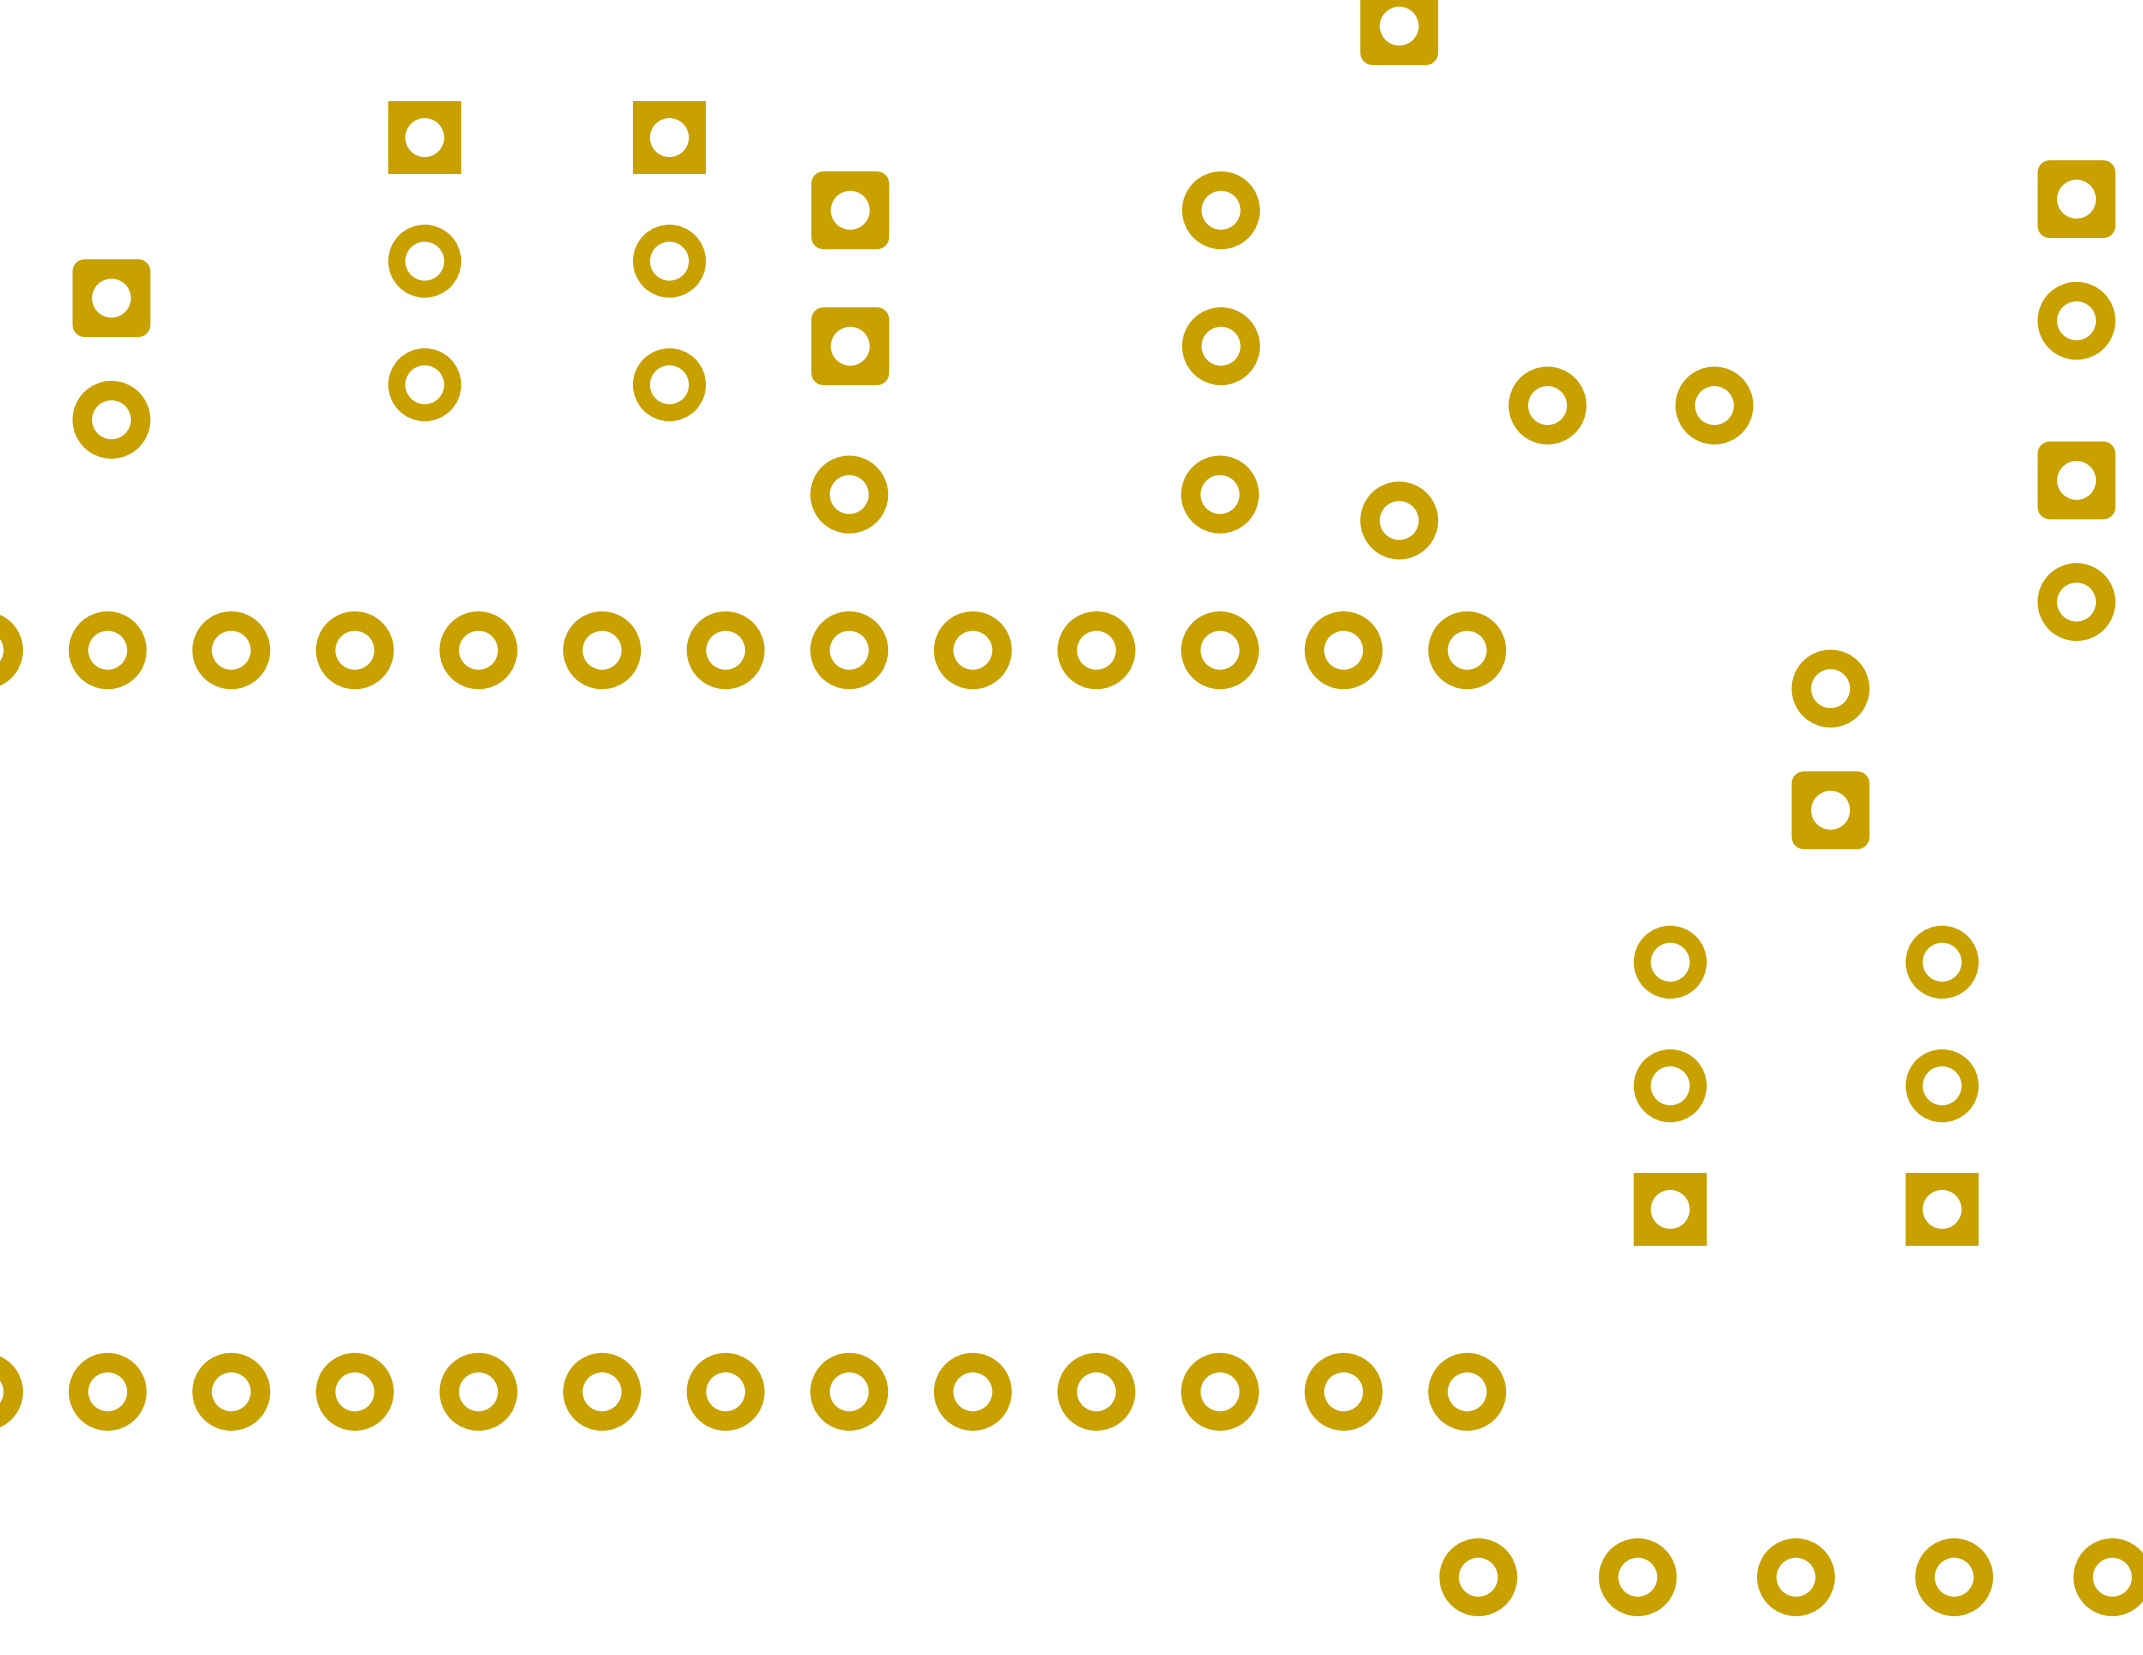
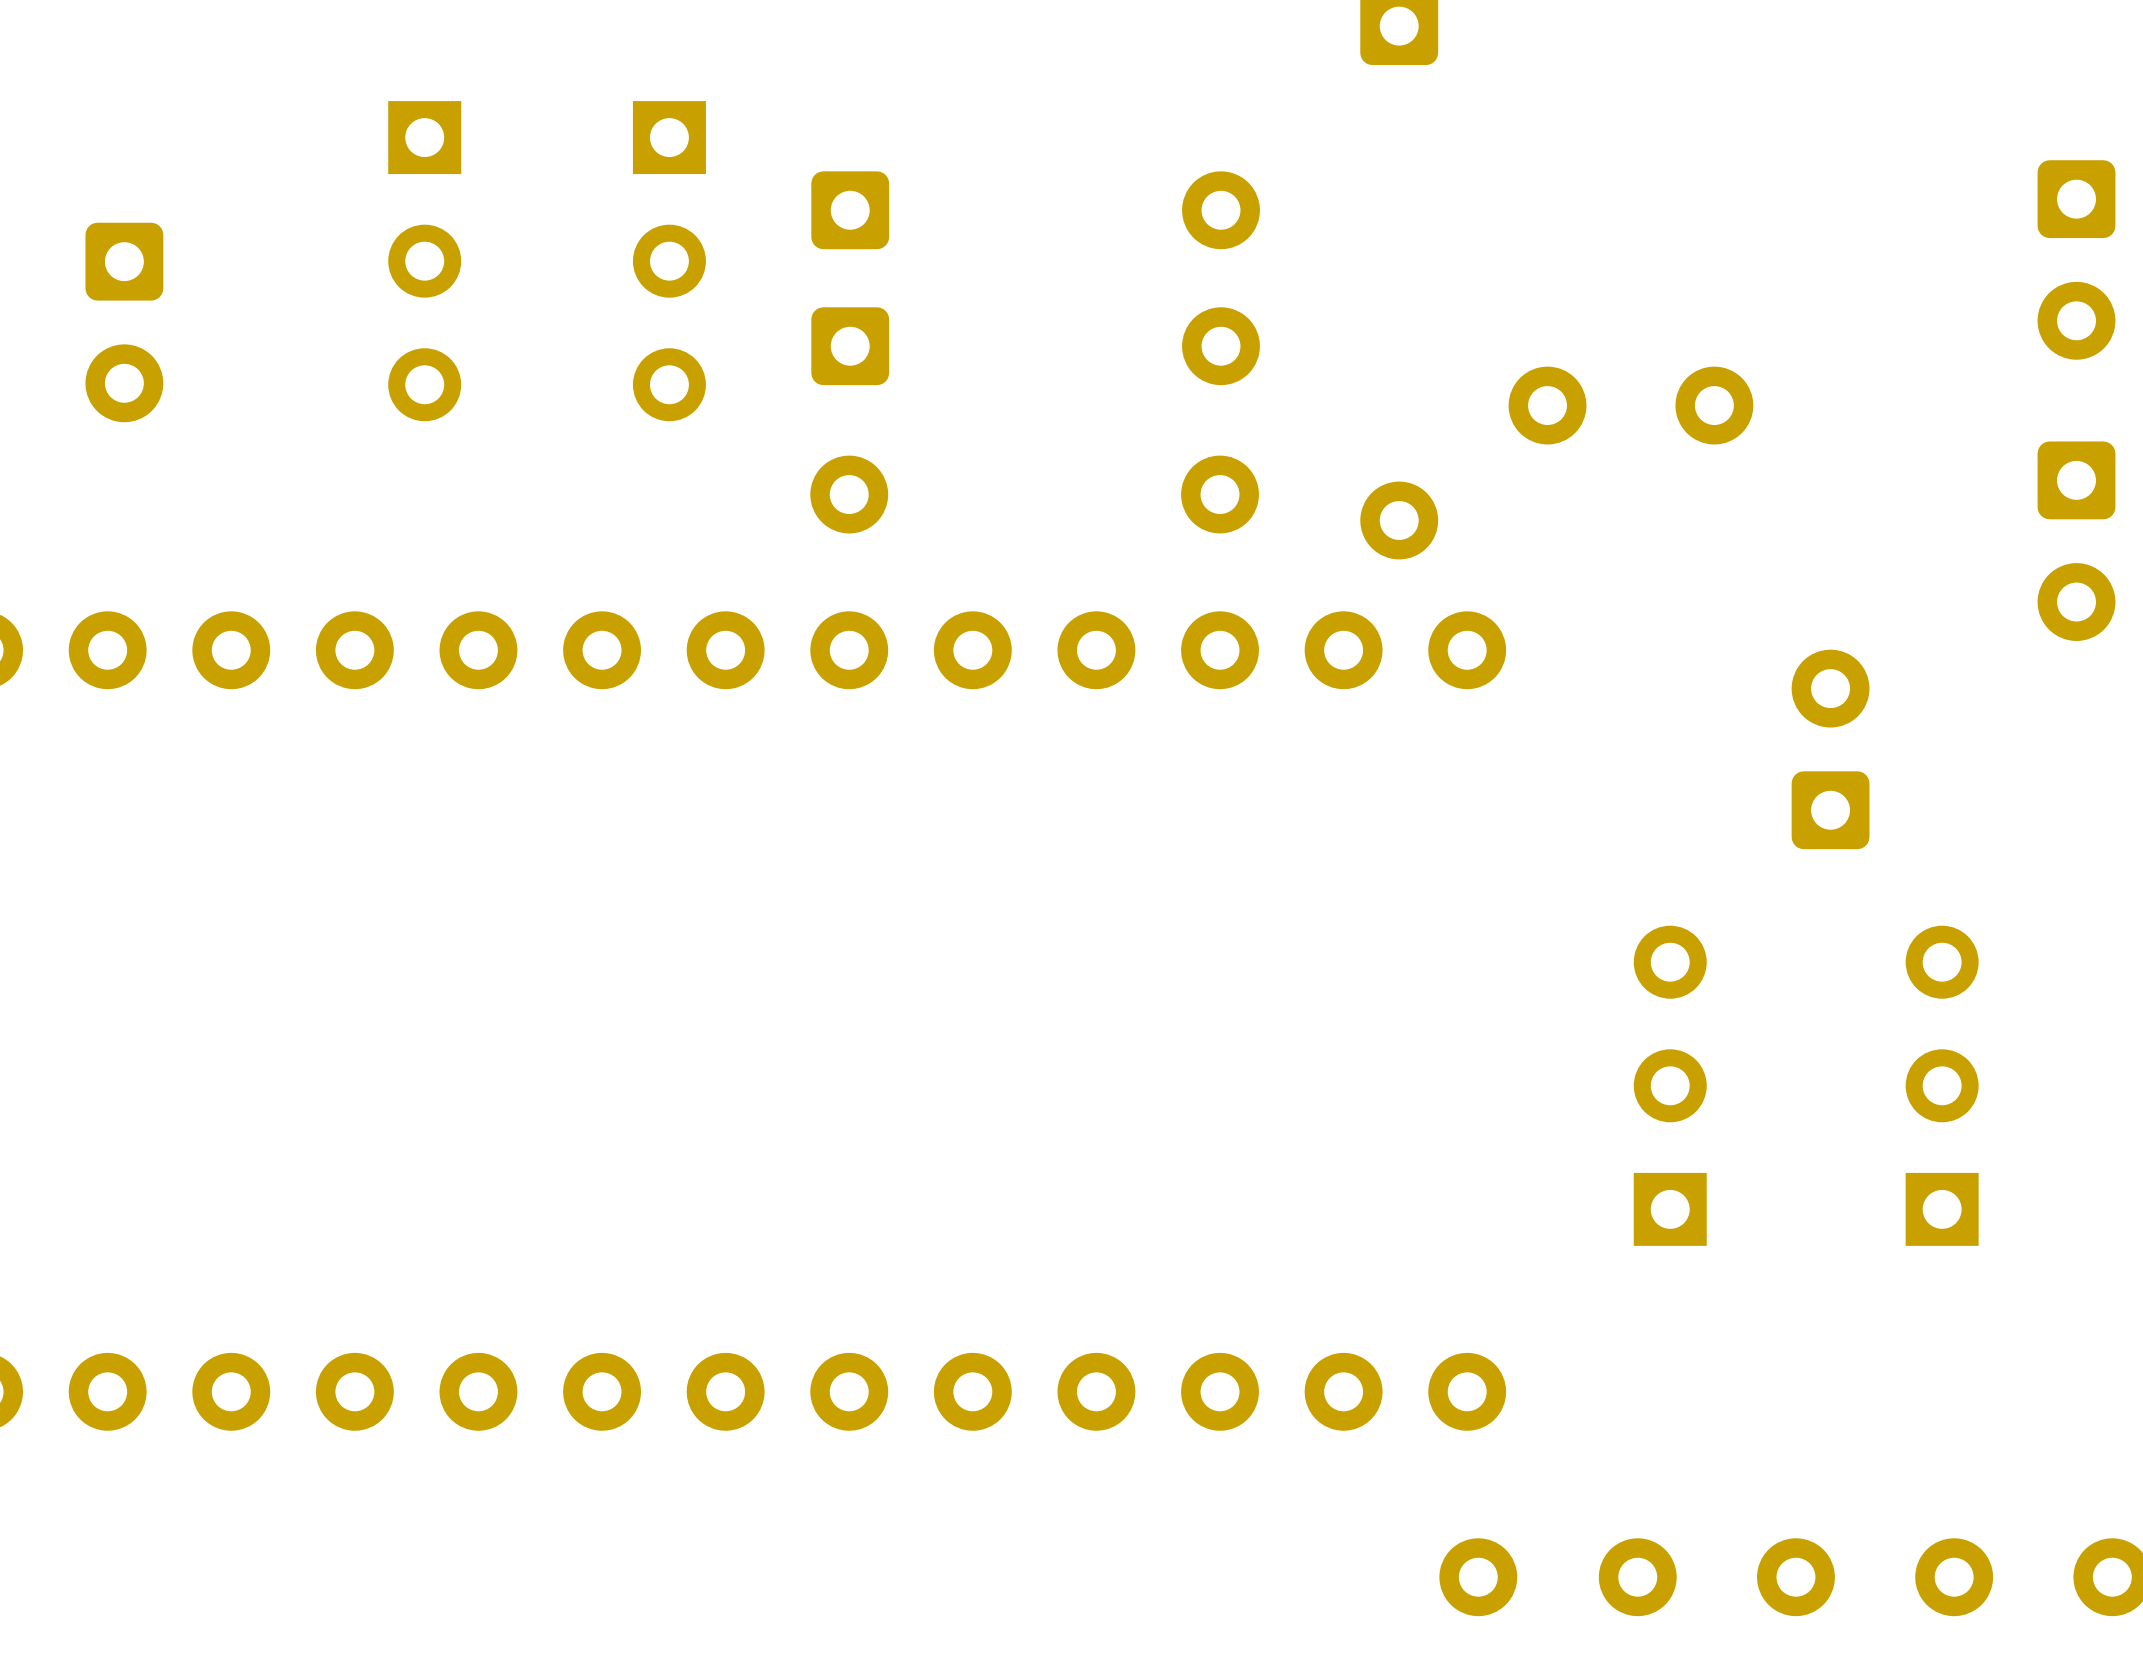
part position: (111, 358) -> (124, 322)

